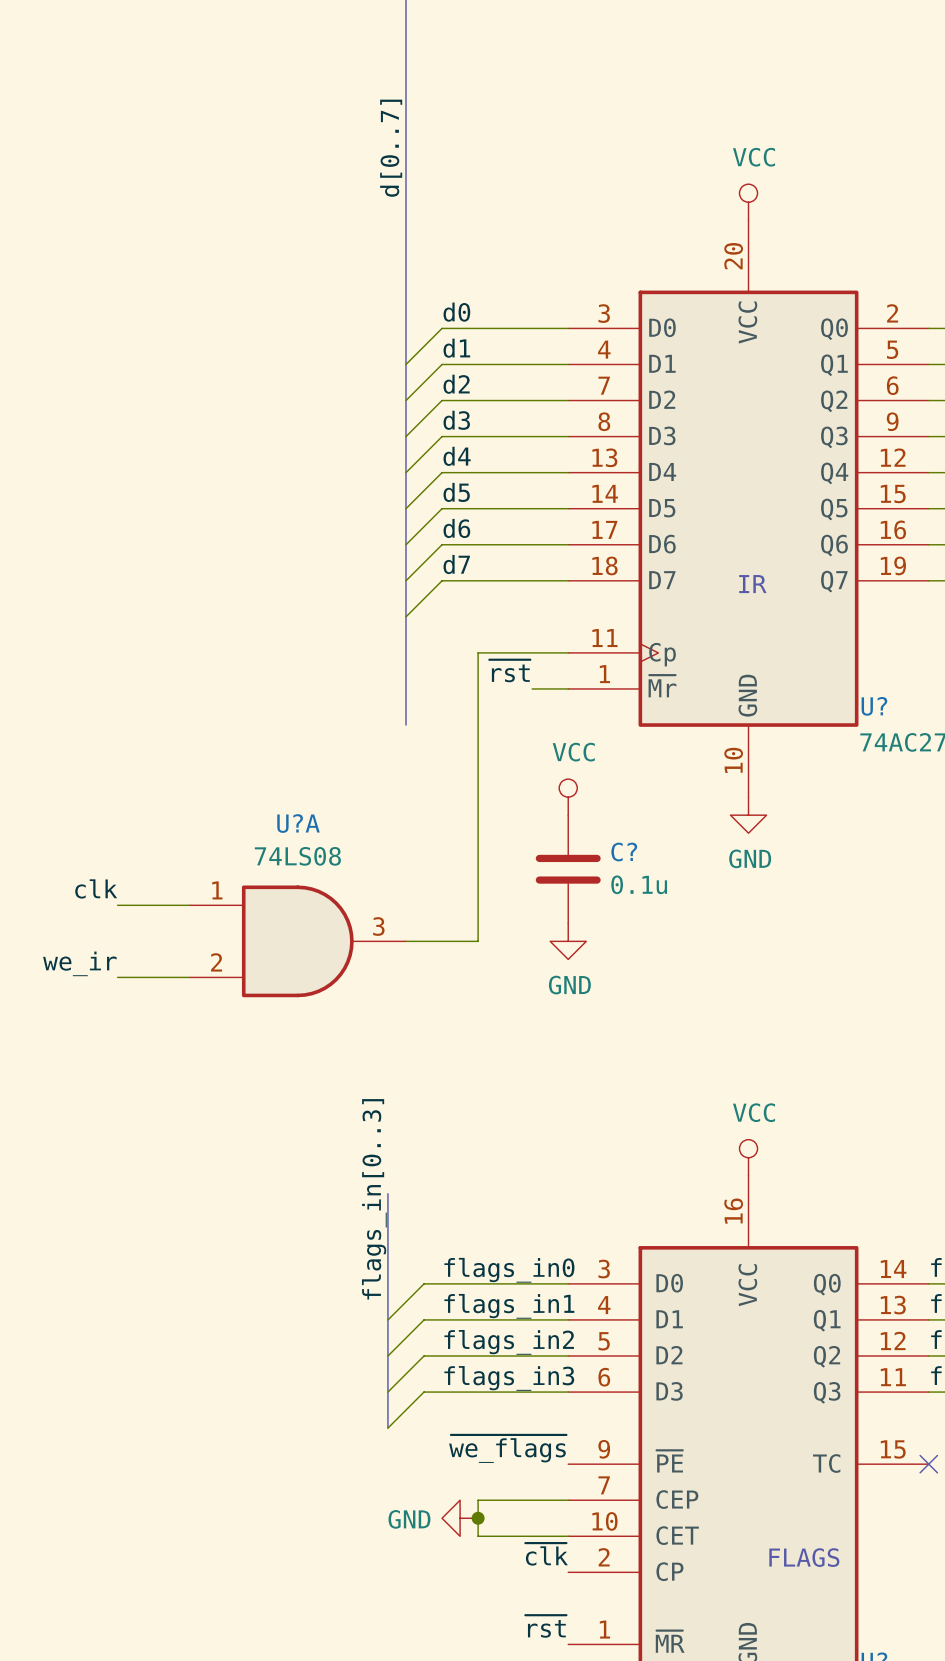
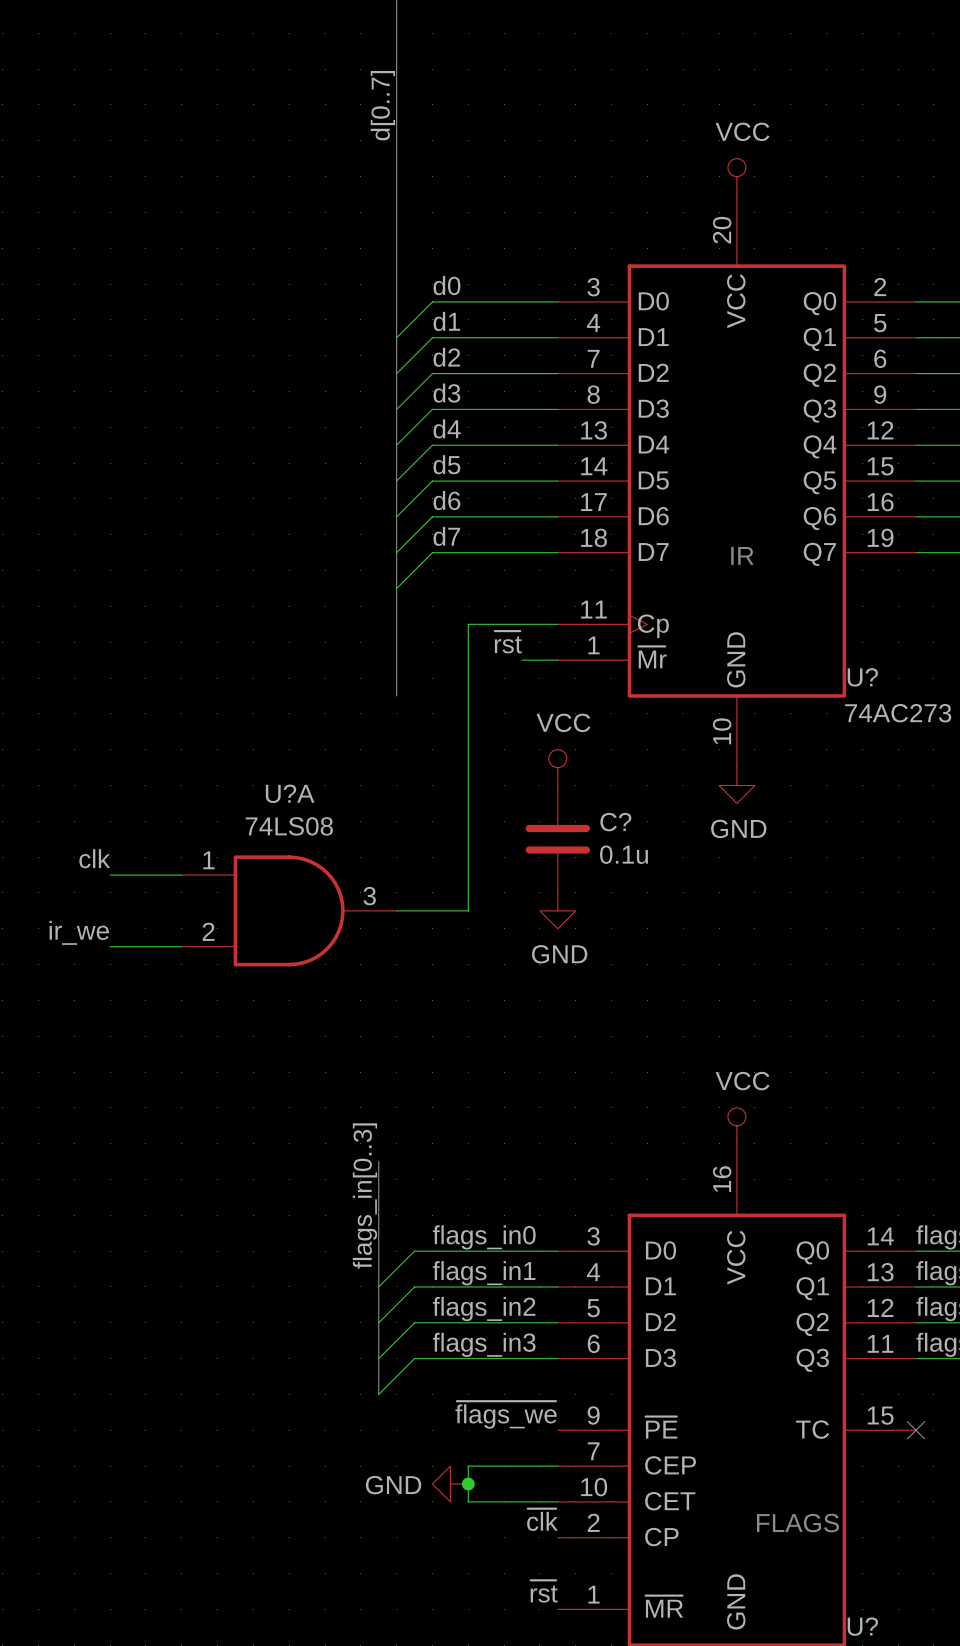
label: we_ir (79, 963) -> ir_we (79, 932)
label: ~{we_flags} (507, 1448) -> ~{flags_we} (506, 1414)

